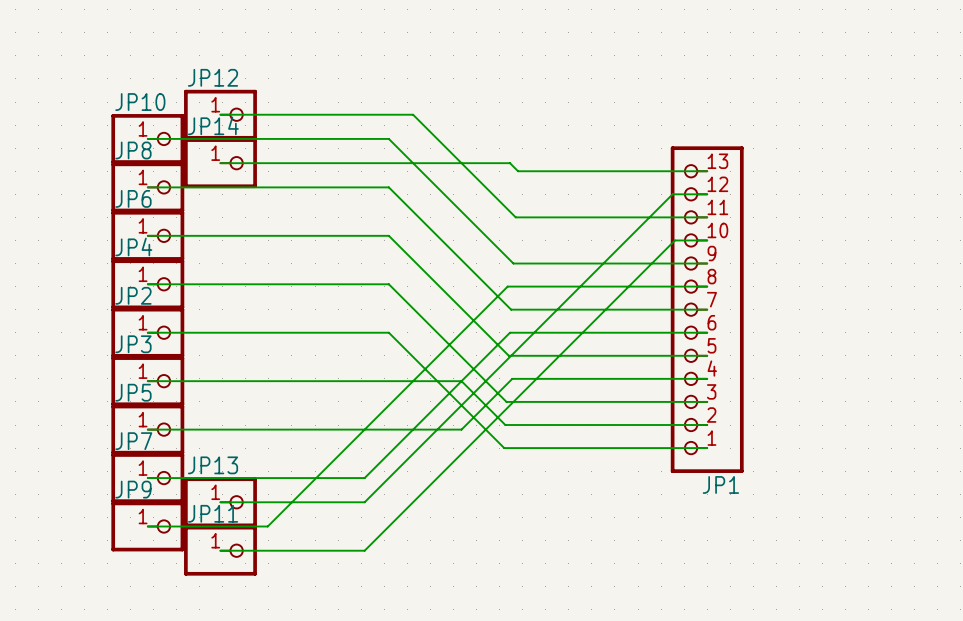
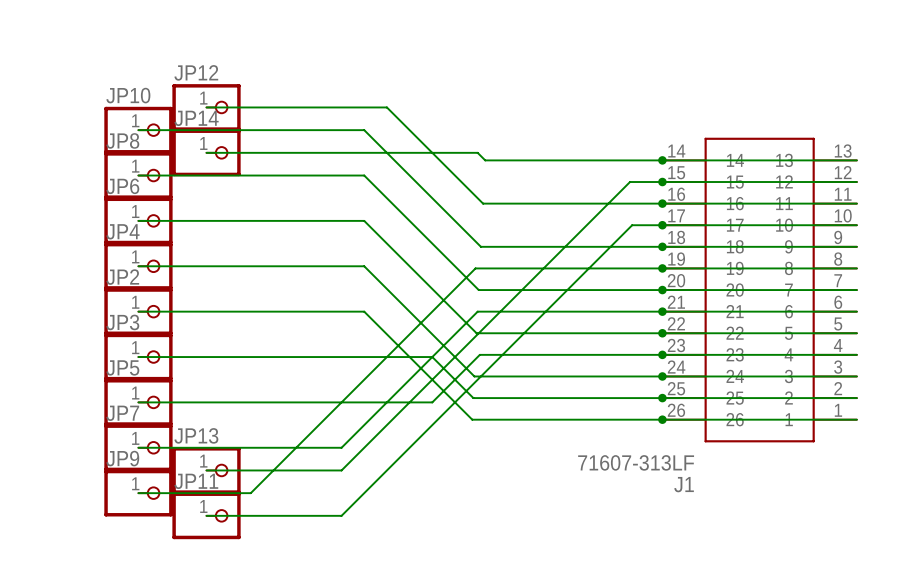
wire: none -> (662, 160) (856, 160)
junction: none -> (662, 160)
wire: none -> (662, 182) (856, 182)
junction: none -> (662, 182)
wire: none -> (662, 203) (856, 203)
junction: none -> (662, 203)
wire: none -> (662, 225) (856, 225)
junction: none -> (662, 225)
wire: none -> (662, 246) (856, 246)
junction: none -> (662, 246)
wire: none -> (662, 268) (856, 268)
junction: none -> (662, 268)
wire: none -> (662, 290) (856, 290)
JP1: (707, 309) -> none
junction: none -> (662, 290)
J1: none -> 71607-313LF (759, 290)
wire: none -> (662, 311) (856, 311)
junction: none -> (662, 311)
wire: none -> (662, 333) (856, 333)
junction: none -> (662, 333)
wire: none -> (662, 354) (856, 354)
junction: none -> (662, 354)
wire: none -> (662, 376) (856, 376)
junction: none -> (662, 376)
wire: none -> (662, 398) (856, 398)
junction: none -> (662, 398)
wire: none -> (662, 419) (856, 419)
junction: none -> (662, 419)

